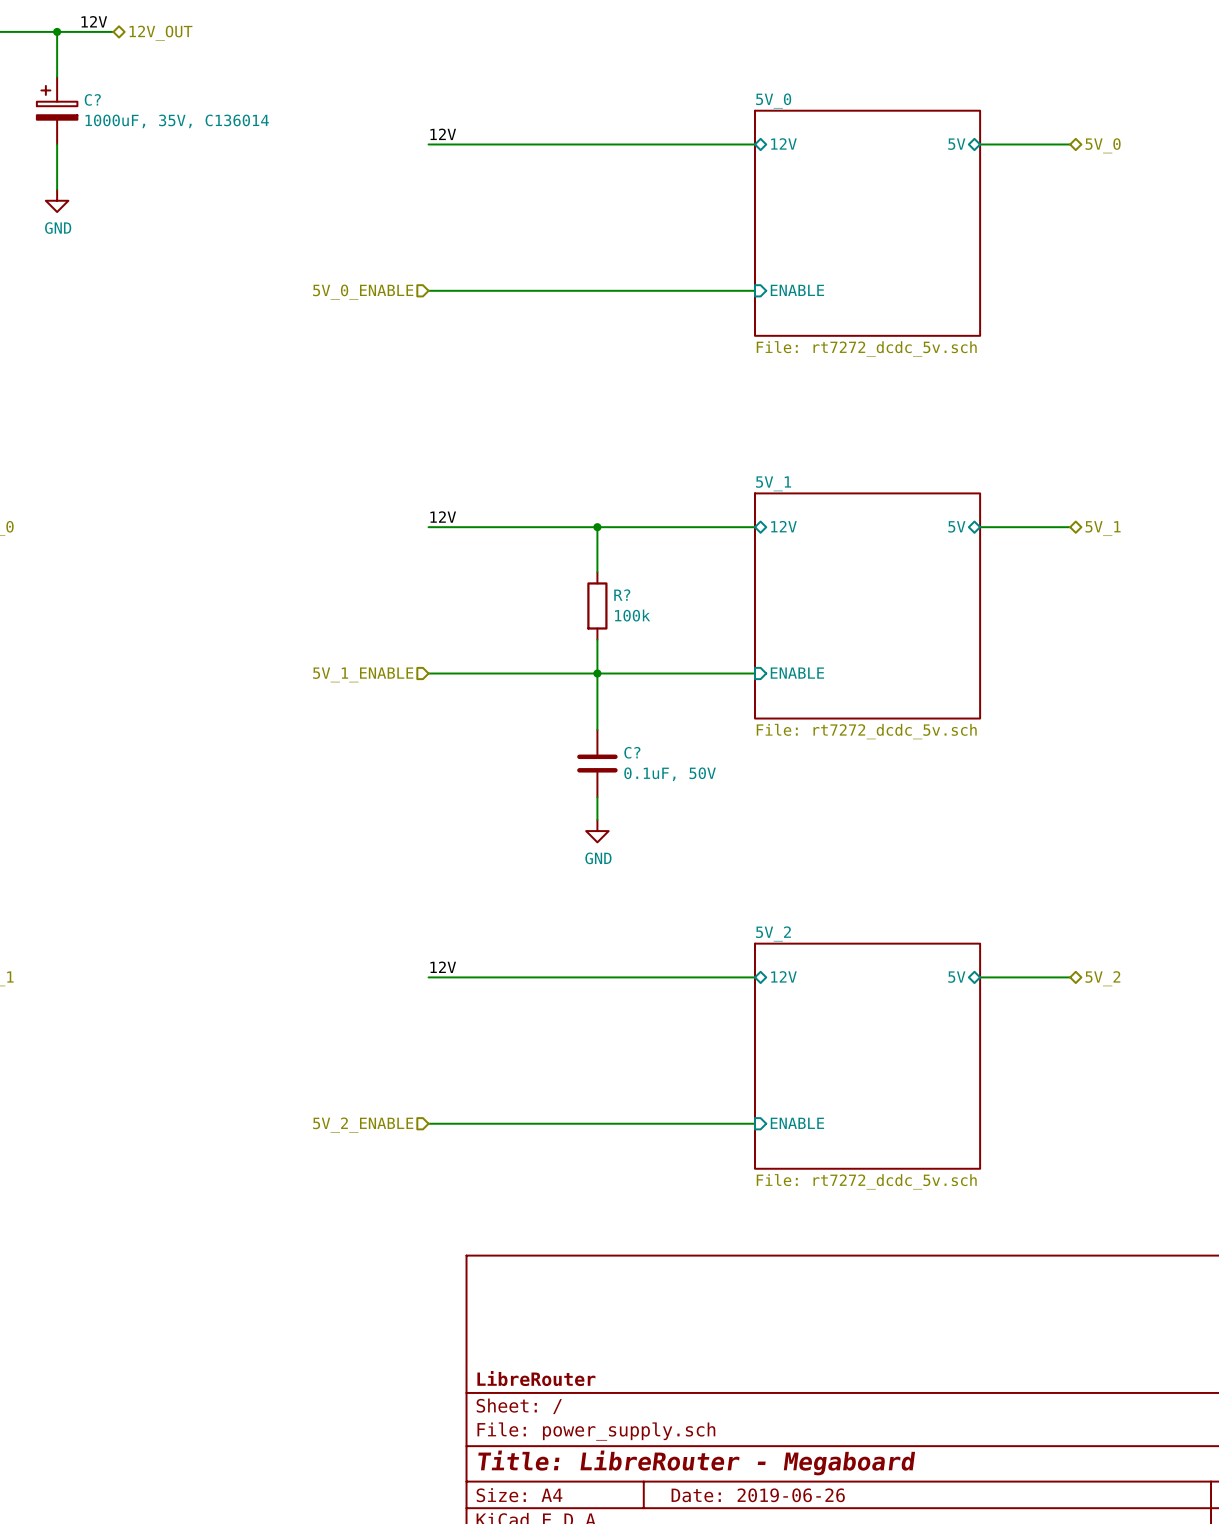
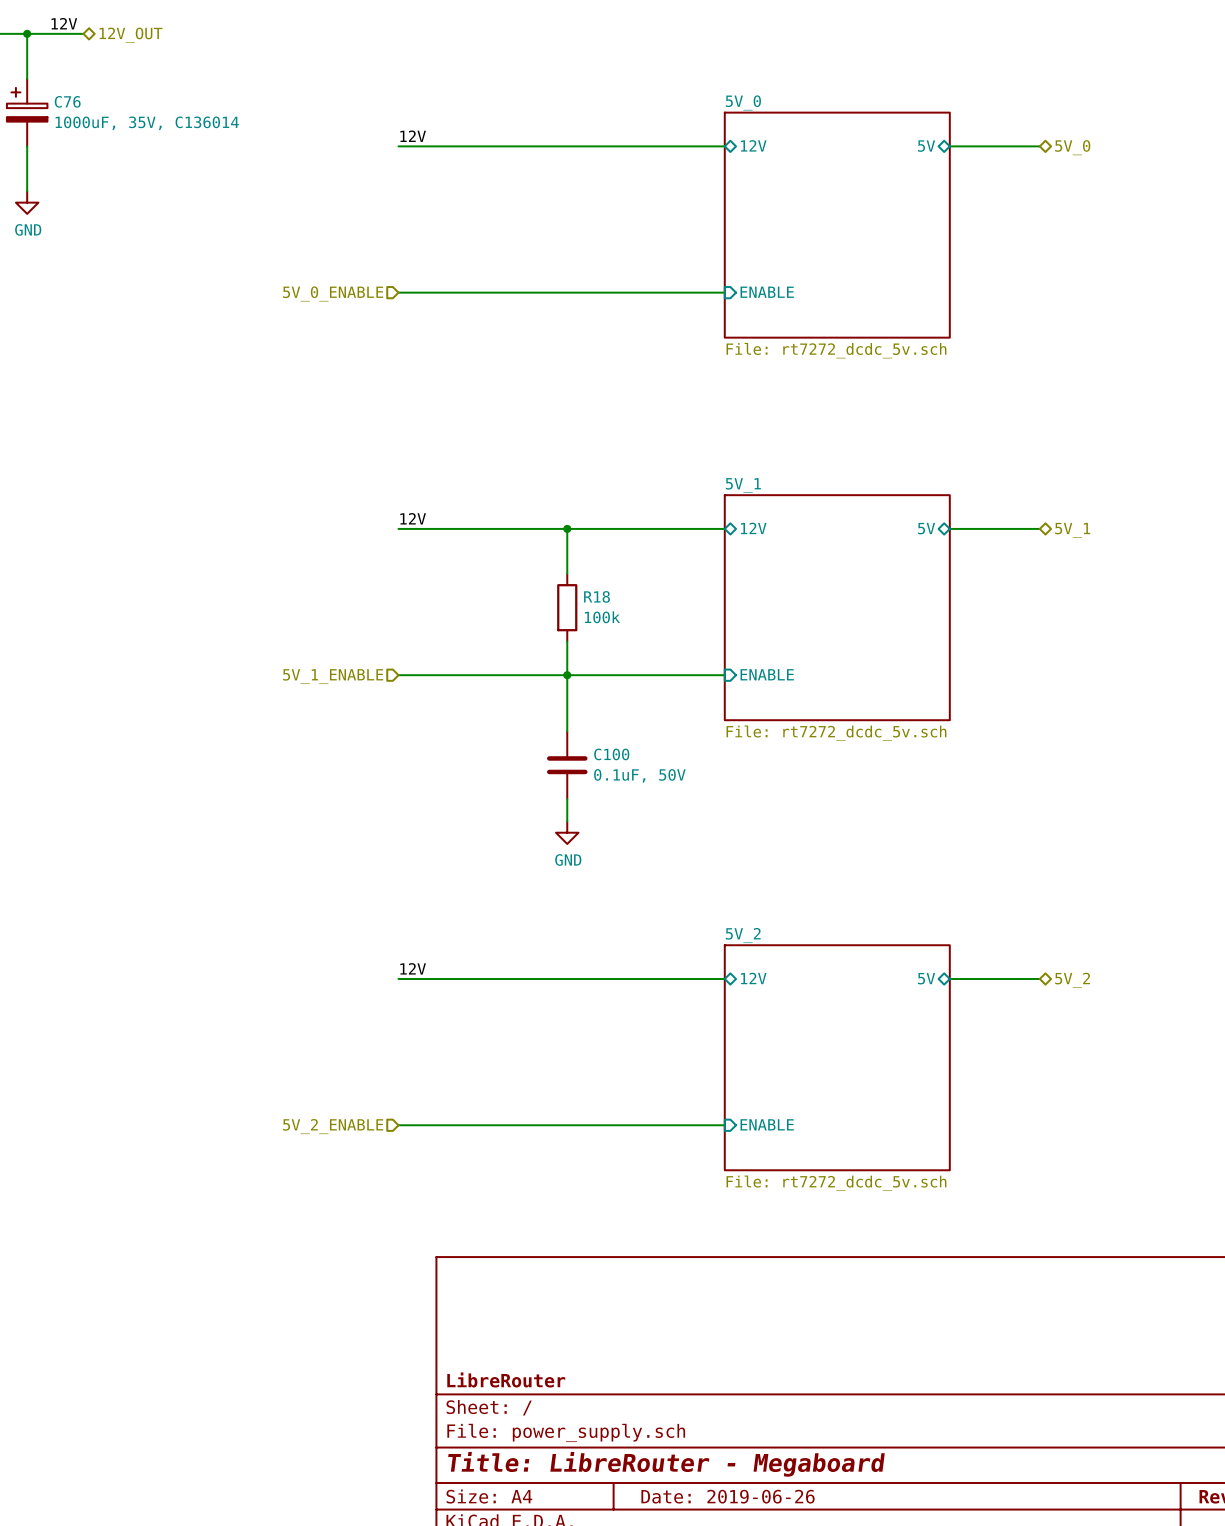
C? name: C? (92, 99) -> C76 (67, 101)
R? name: R? (622, 595) -> R18 (596, 596)
C? name: C? (632, 752) -> C100 (611, 754)

